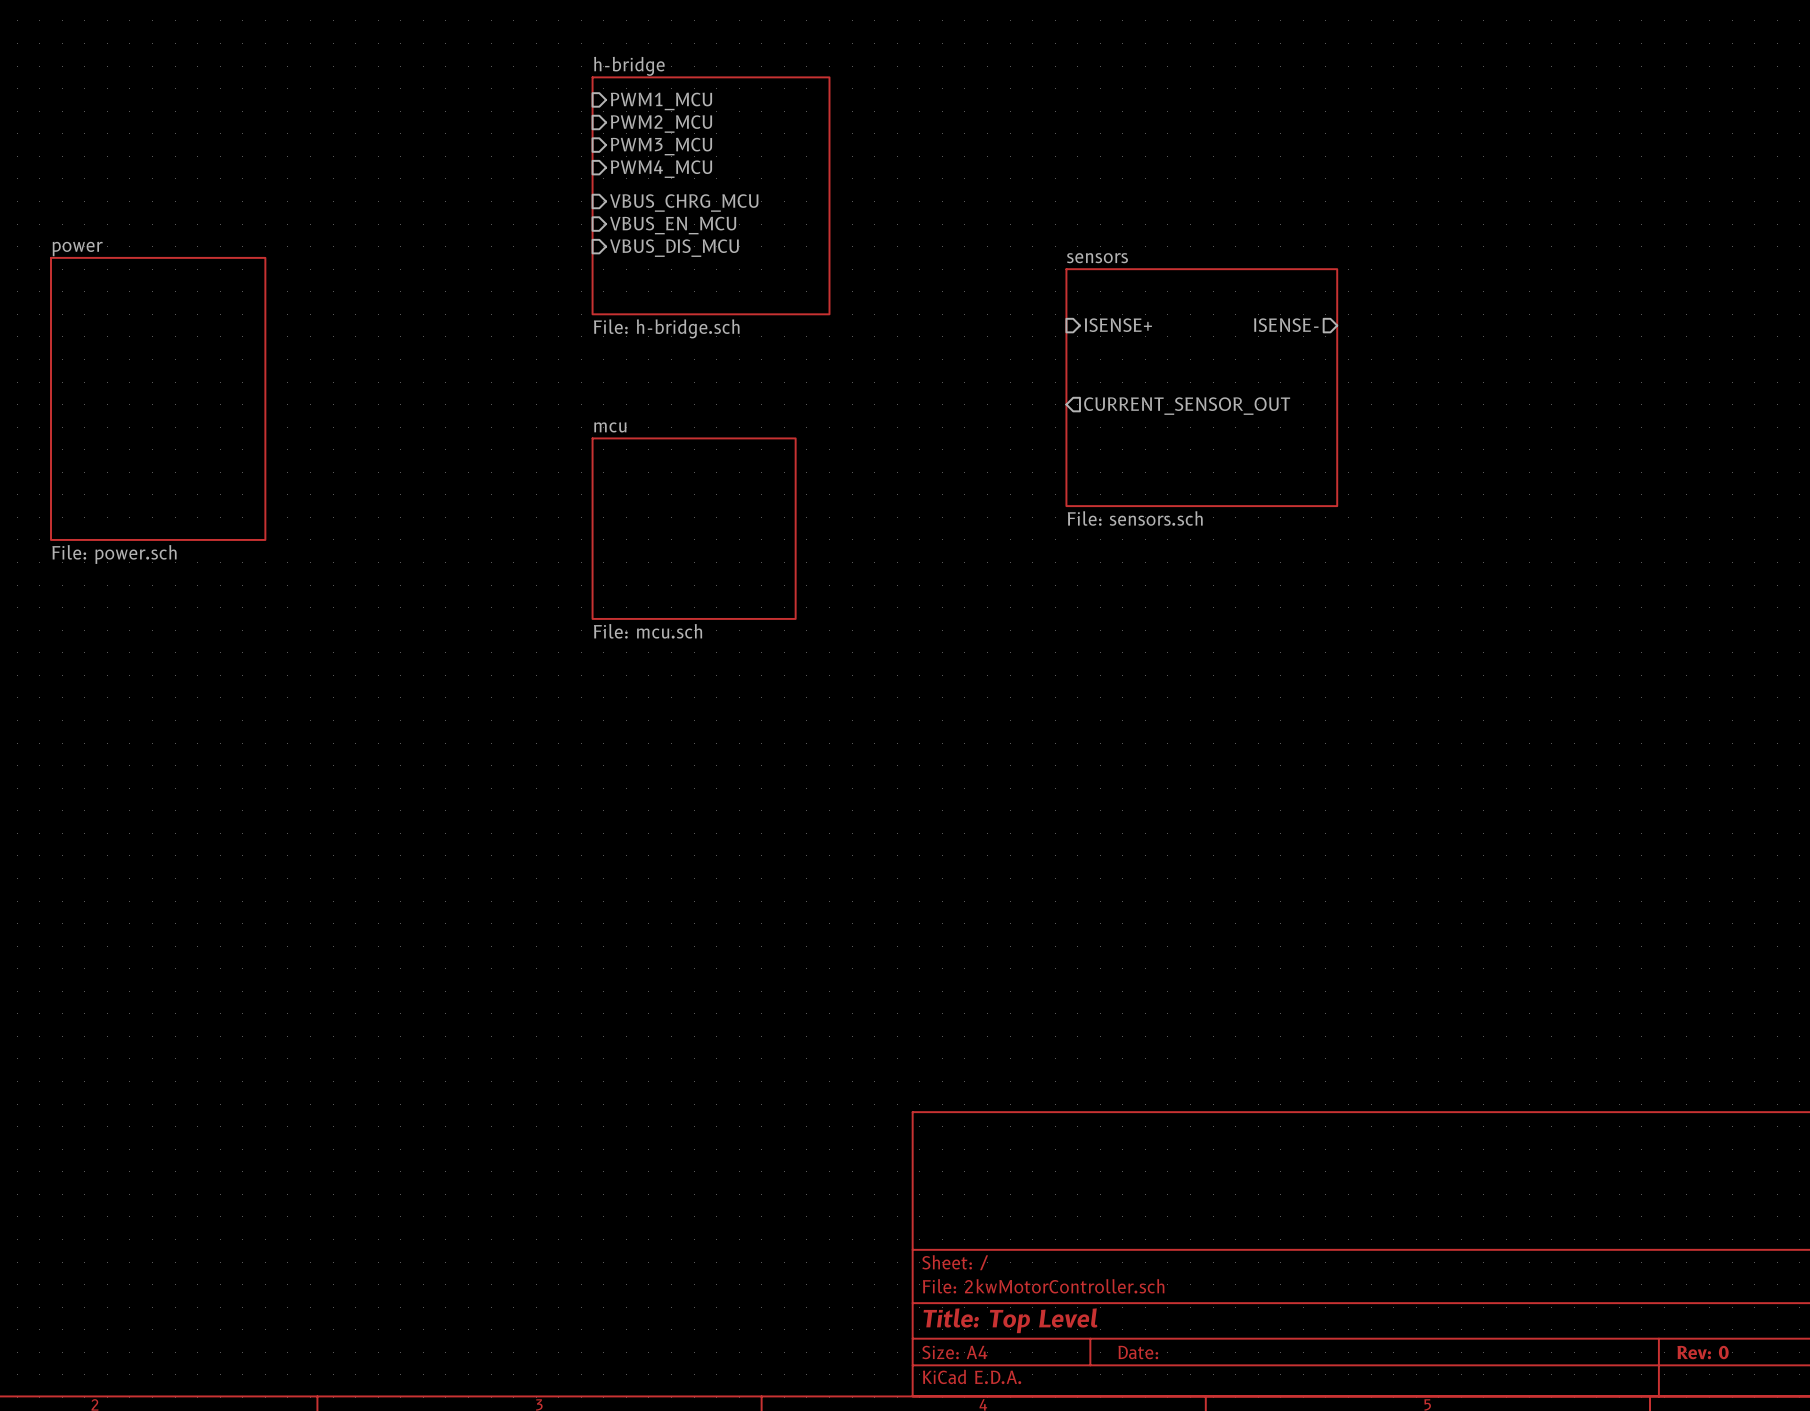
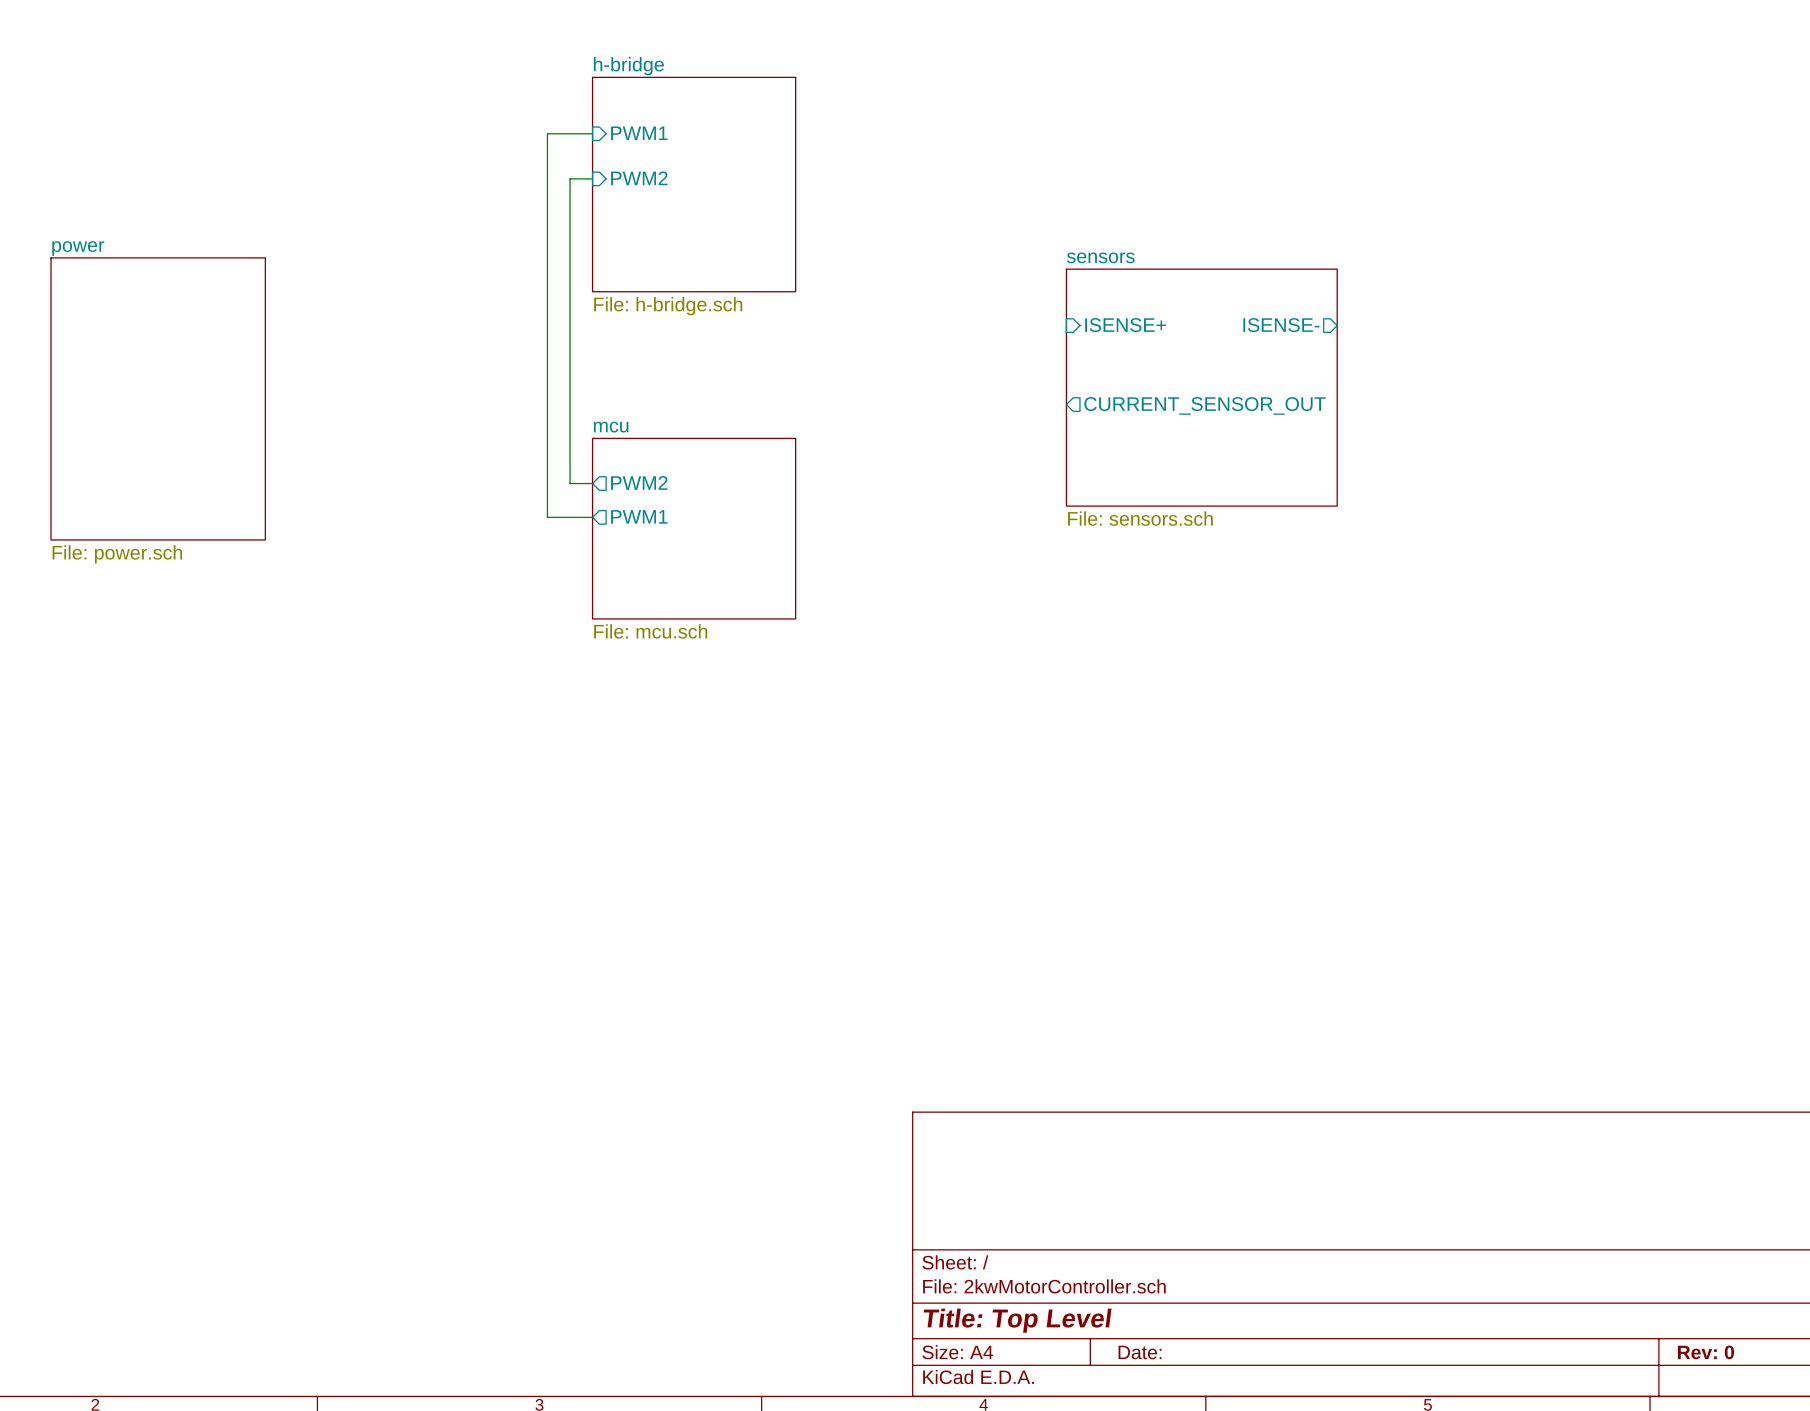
sheet pin: PWM1_MCU (661, 101) -> none
sheet pin: PWM2_MCU (661, 124) -> none
wire: none -> (592, 133) (547, 133) (547, 517) (592, 517)
sheet pin: none -> PWM1 (639, 133)
sheet pin: PWM3_MCU (661, 146) -> none
sheet pin: PWM4_MCU (661, 169) -> none
wire: none -> (592, 178) (569, 178) (569, 483) (592, 483)
sheet pin: none -> PWM2 (639, 178)
sheet h-bridge: none -> File: h-bridge.sch (694, 184)
sheet h-bridge: File: h-bridge.sch (711, 195) -> none
sheet pin: VBUS_CHRG_MCU (684, 203) -> none
sheet pin: VBUS_EN_MCU (673, 225) -> none
sheet pin: VBUS_DIS_MCU (674, 248) -> none
sheet pin: none -> PWM2 (639, 482)
sheet pin: none -> PWM1 (639, 516)

